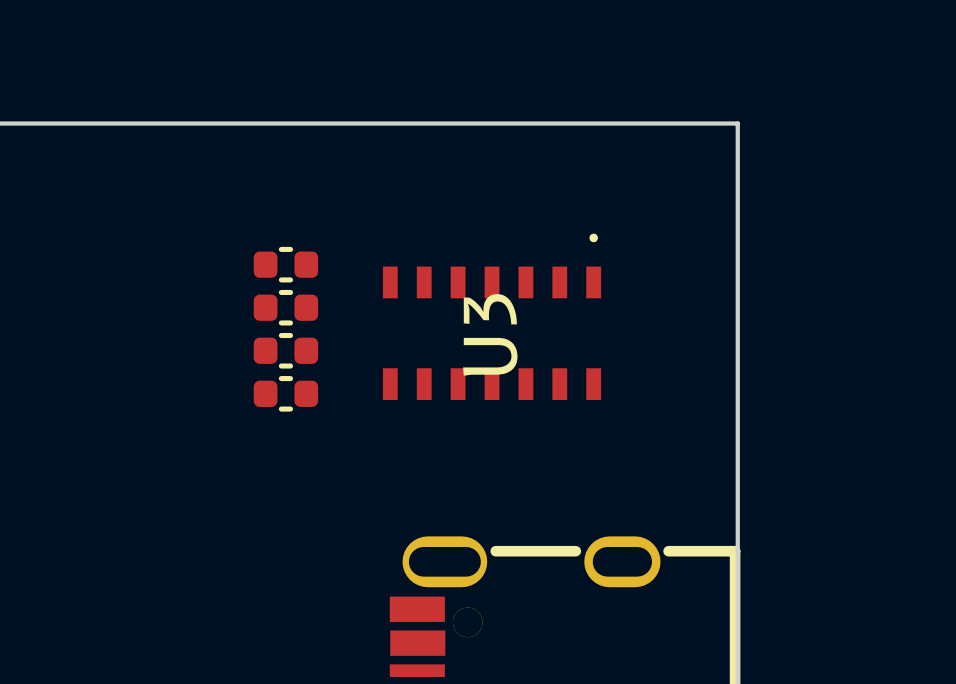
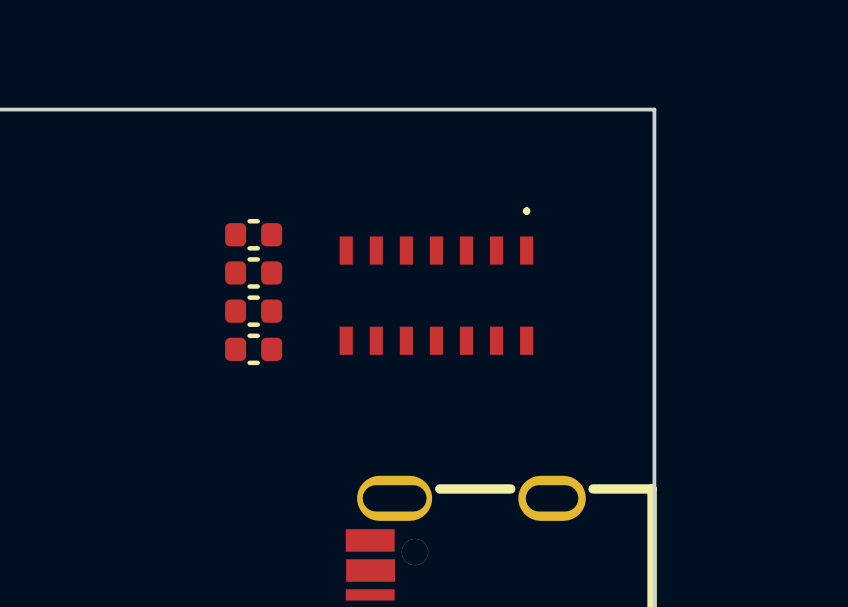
U3 name: U3 (490, 334) -> none

